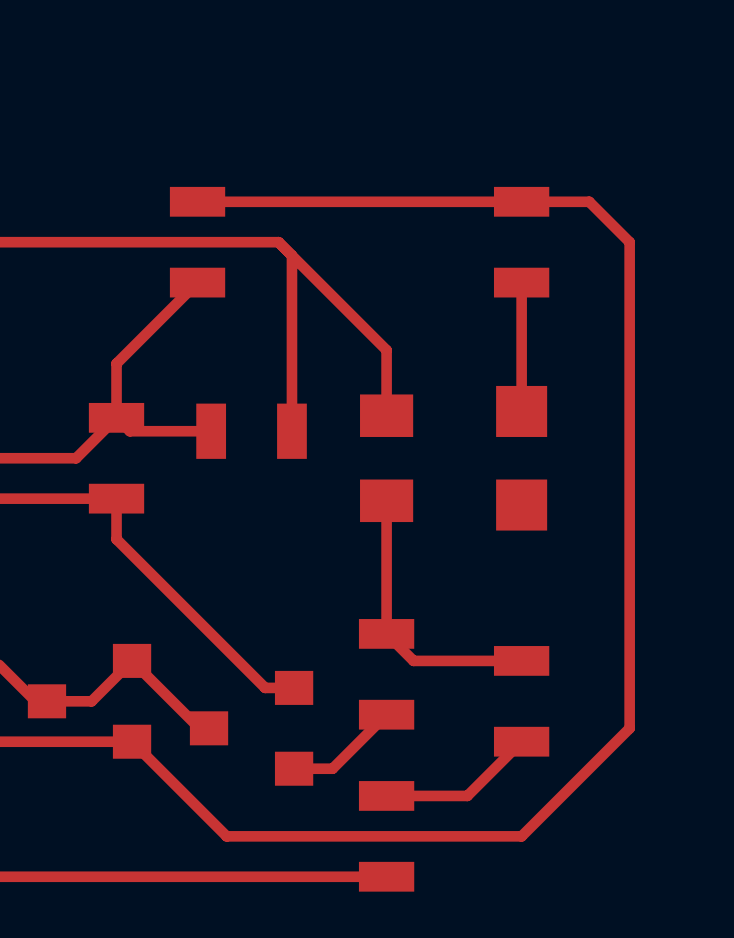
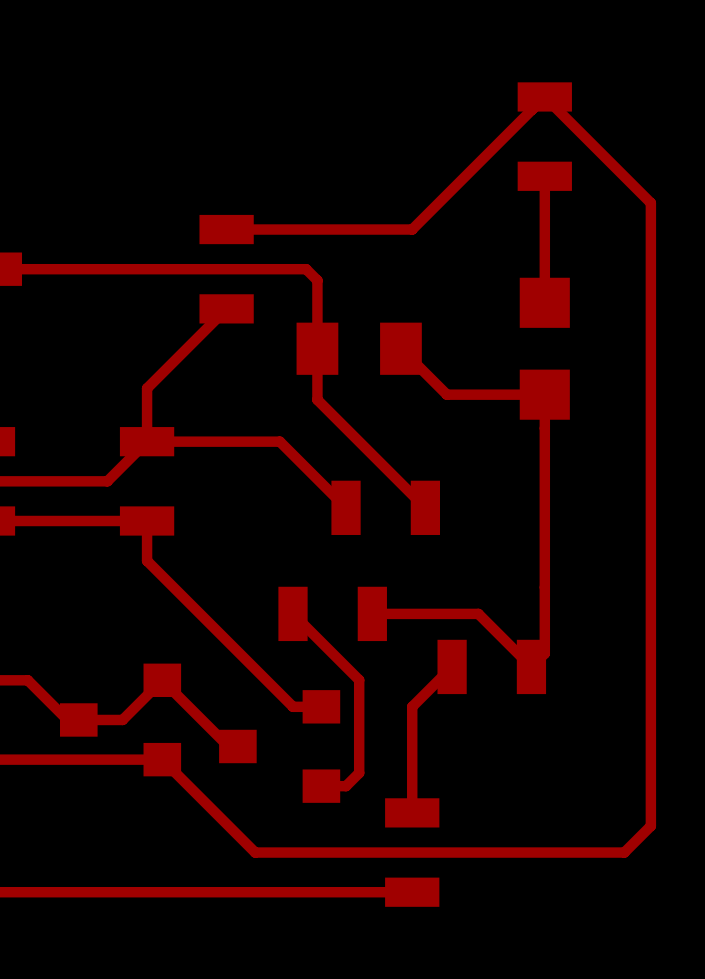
top track: none -> (544, 176) (544, 302)
top track: (386, 201) (589, 201) (629, 242) -> (412, 229) (544, 96) (650, 203) (650, 269)
part position: (521, 242) -> (544, 136)
top track: (290, 253) (386, 350) (386, 415) -> (317, 280) (317, 399) (425, 507)
top track: (291, 255) (291, 431) -> none
top track: (521, 282) (521, 370) -> (400, 348) (446, 394) (544, 394)
part: none -> (359, 348)
part footprint: [360, 394, 414, 523] -> [331, 480, 440, 535]
top track: none -> (544, 435) (544, 653) (531, 666) (478, 613) (372, 613)
top track: (116, 417) (129, 431) (211, 431) -> (147, 441) (279, 441) (346, 507)
part: (251, 431) -> none
part position: (521, 458) -> (544, 348)
top track: (390, 500) (386, 500) (386, 633) (413, 660) (521, 660) -> none
part: none -> (332, 613)
part: none -> (491, 666)
part: (386, 674) -> none
part: (521, 701) -> none
top track: (386, 714) (332, 768) (319, 768) -> (293, 613) (359, 680) (359, 773) (346, 786)
top track: (629, 728) (521, 836) -> (650, 746) (650, 826) (624, 852) (544, 852)
top track: (521, 741) (467, 795) (386, 795) -> (452, 666) (412, 706) (412, 812)

